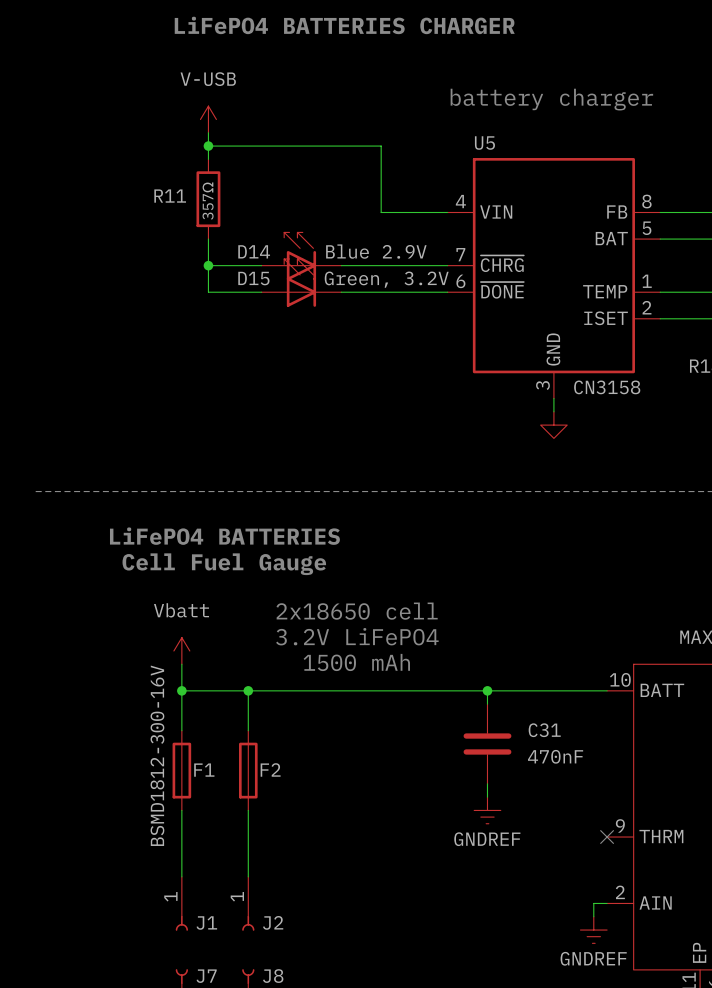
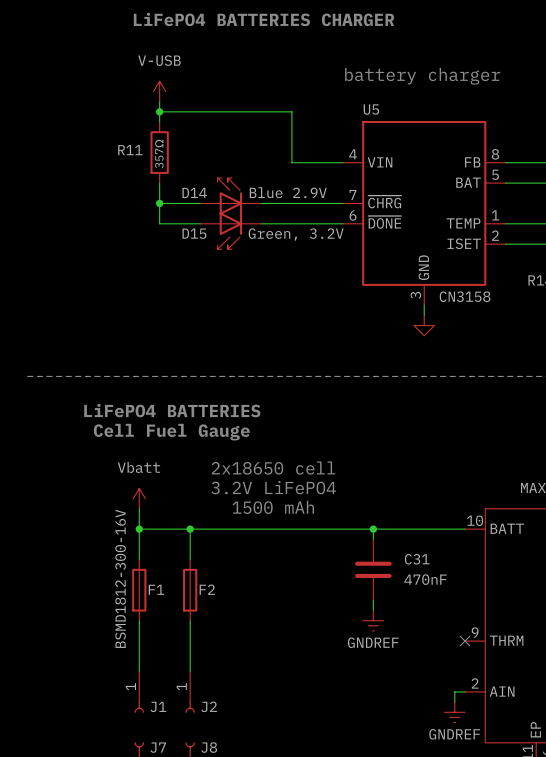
D15 flip: as is (300, 282) -> up-down (229, 230)

